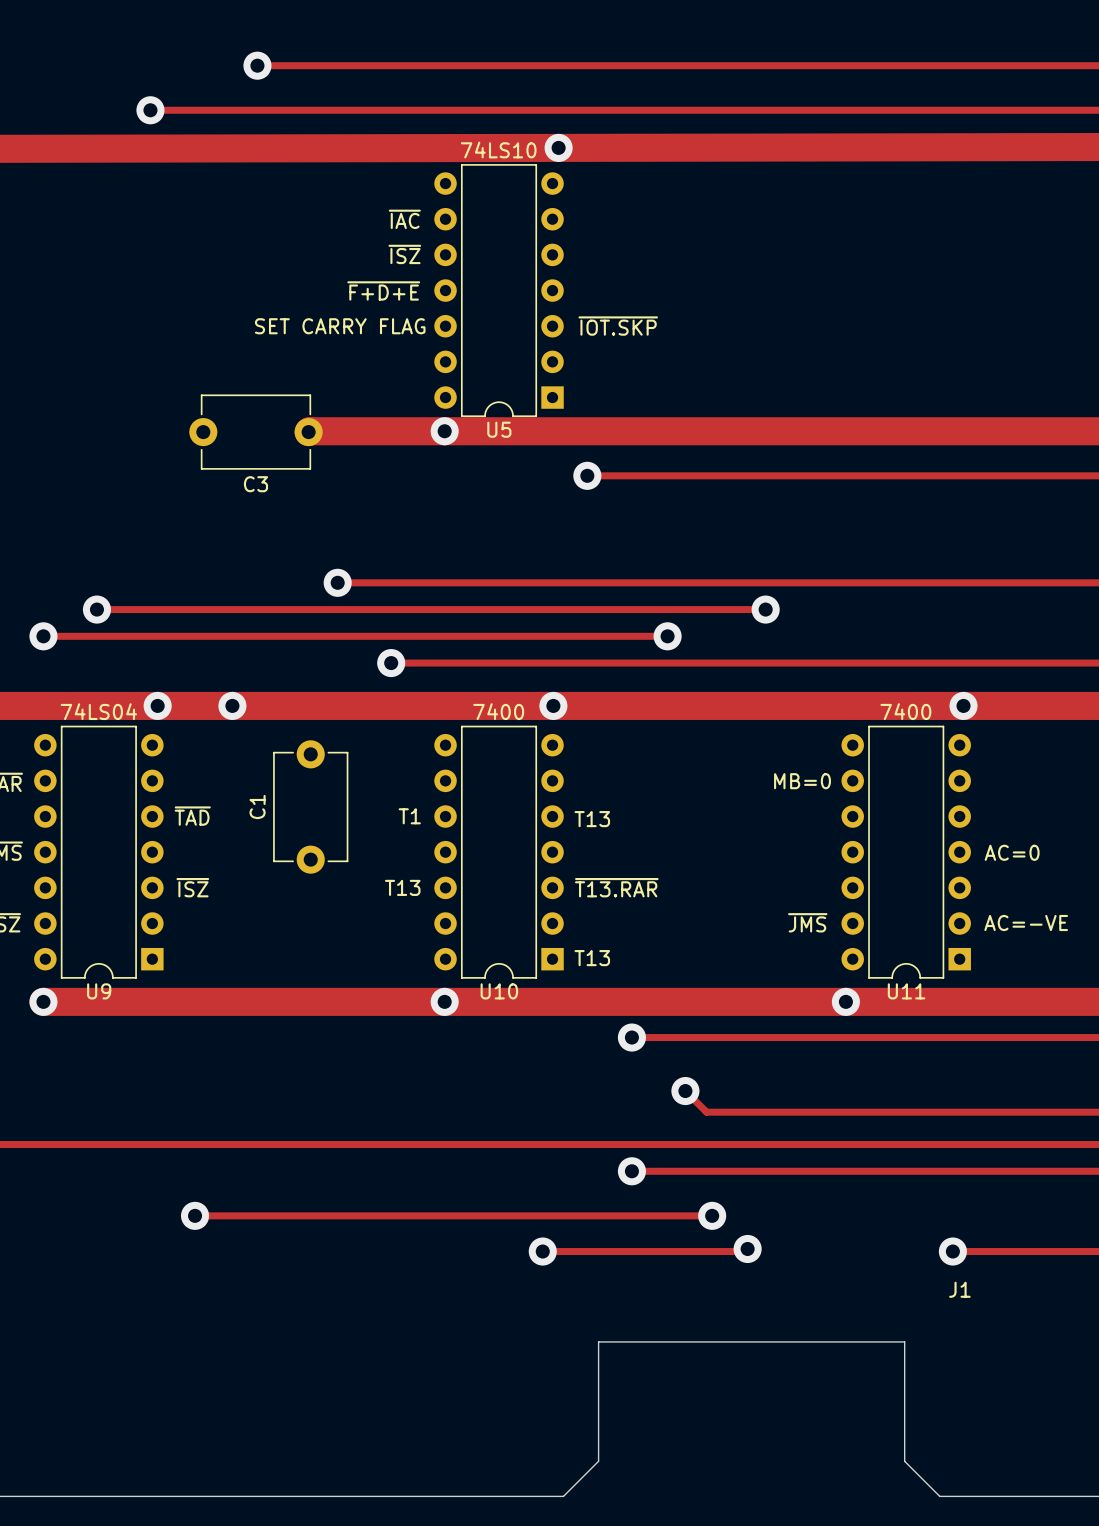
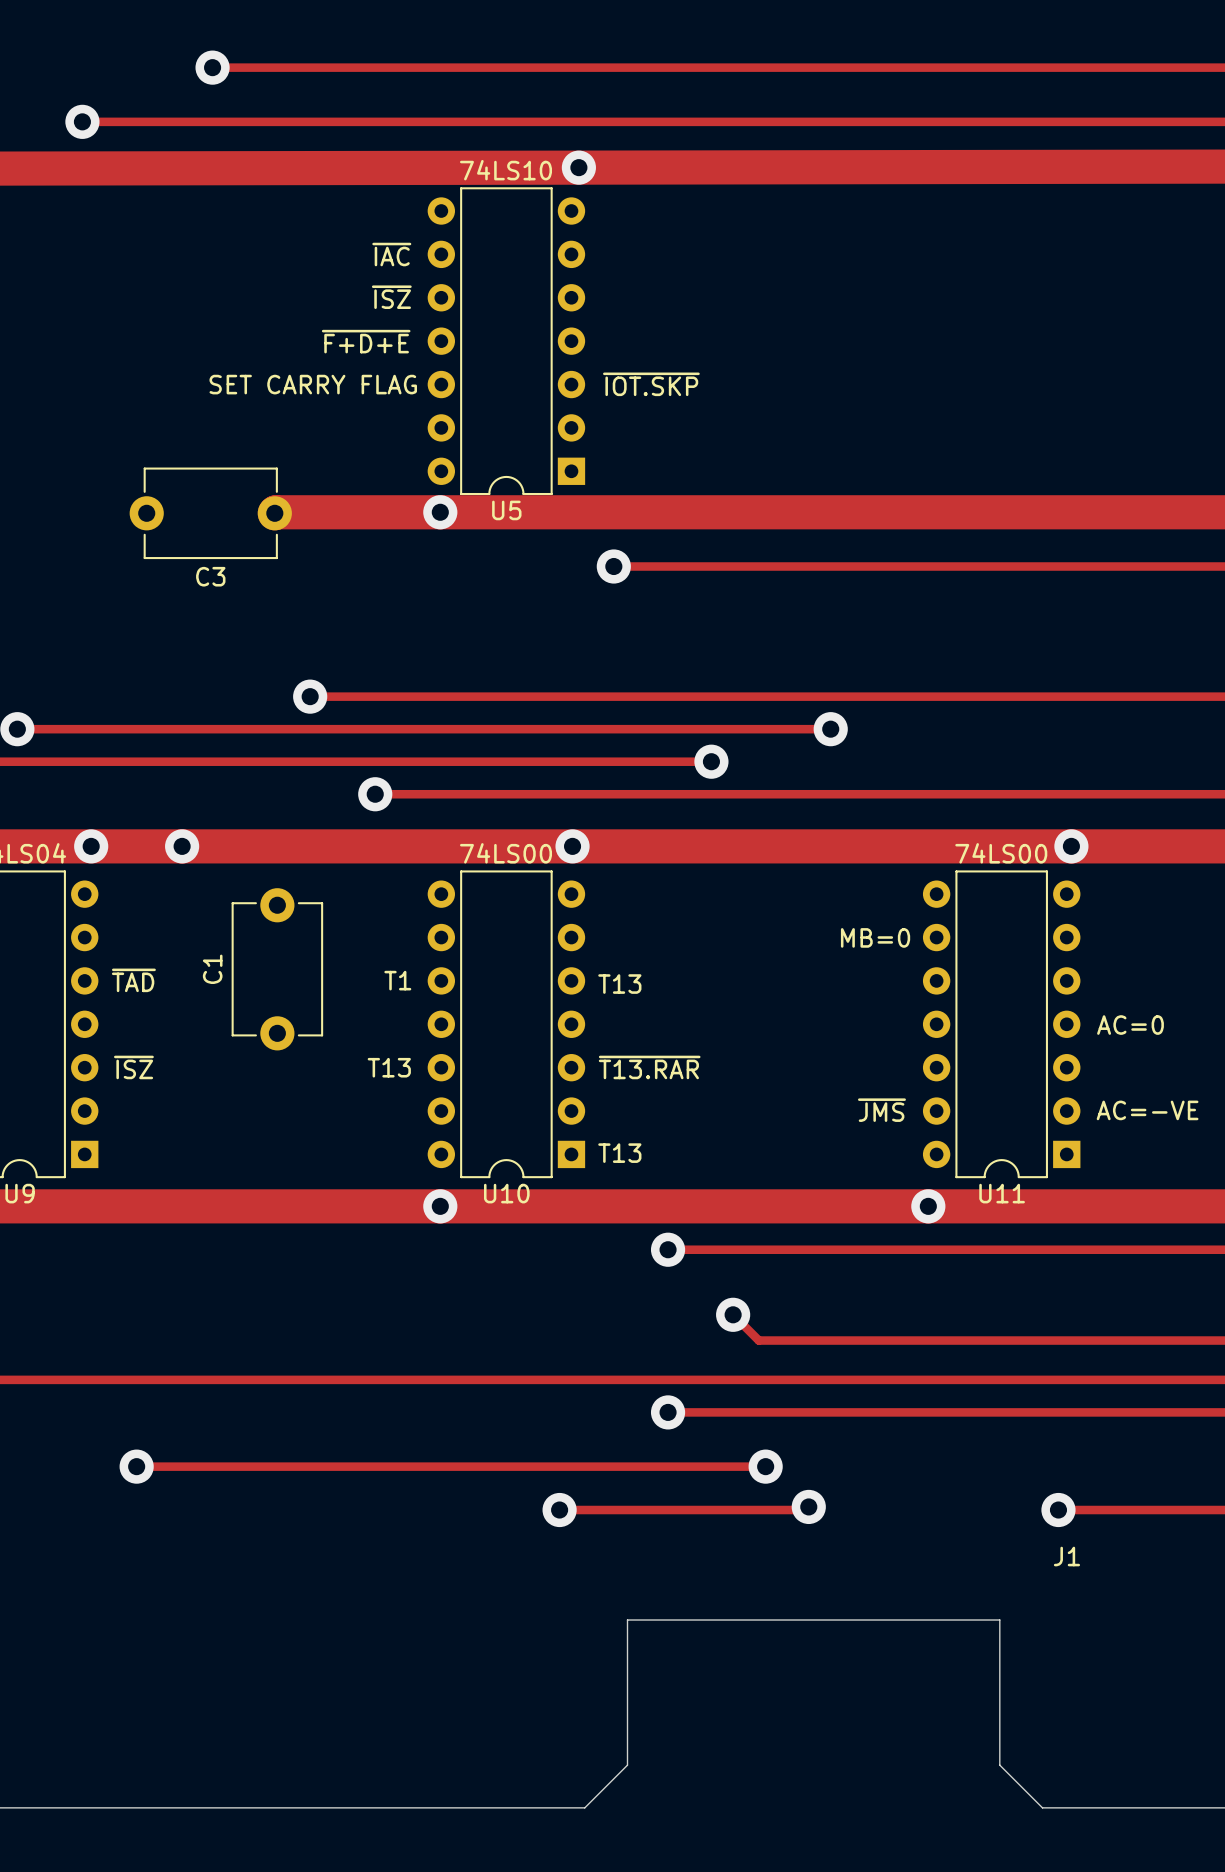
U10 value: 7400 (498, 711) -> 74LS00 (506, 853)
U11 value: 7400 (905, 711) -> 74LS00 (1001, 853)

